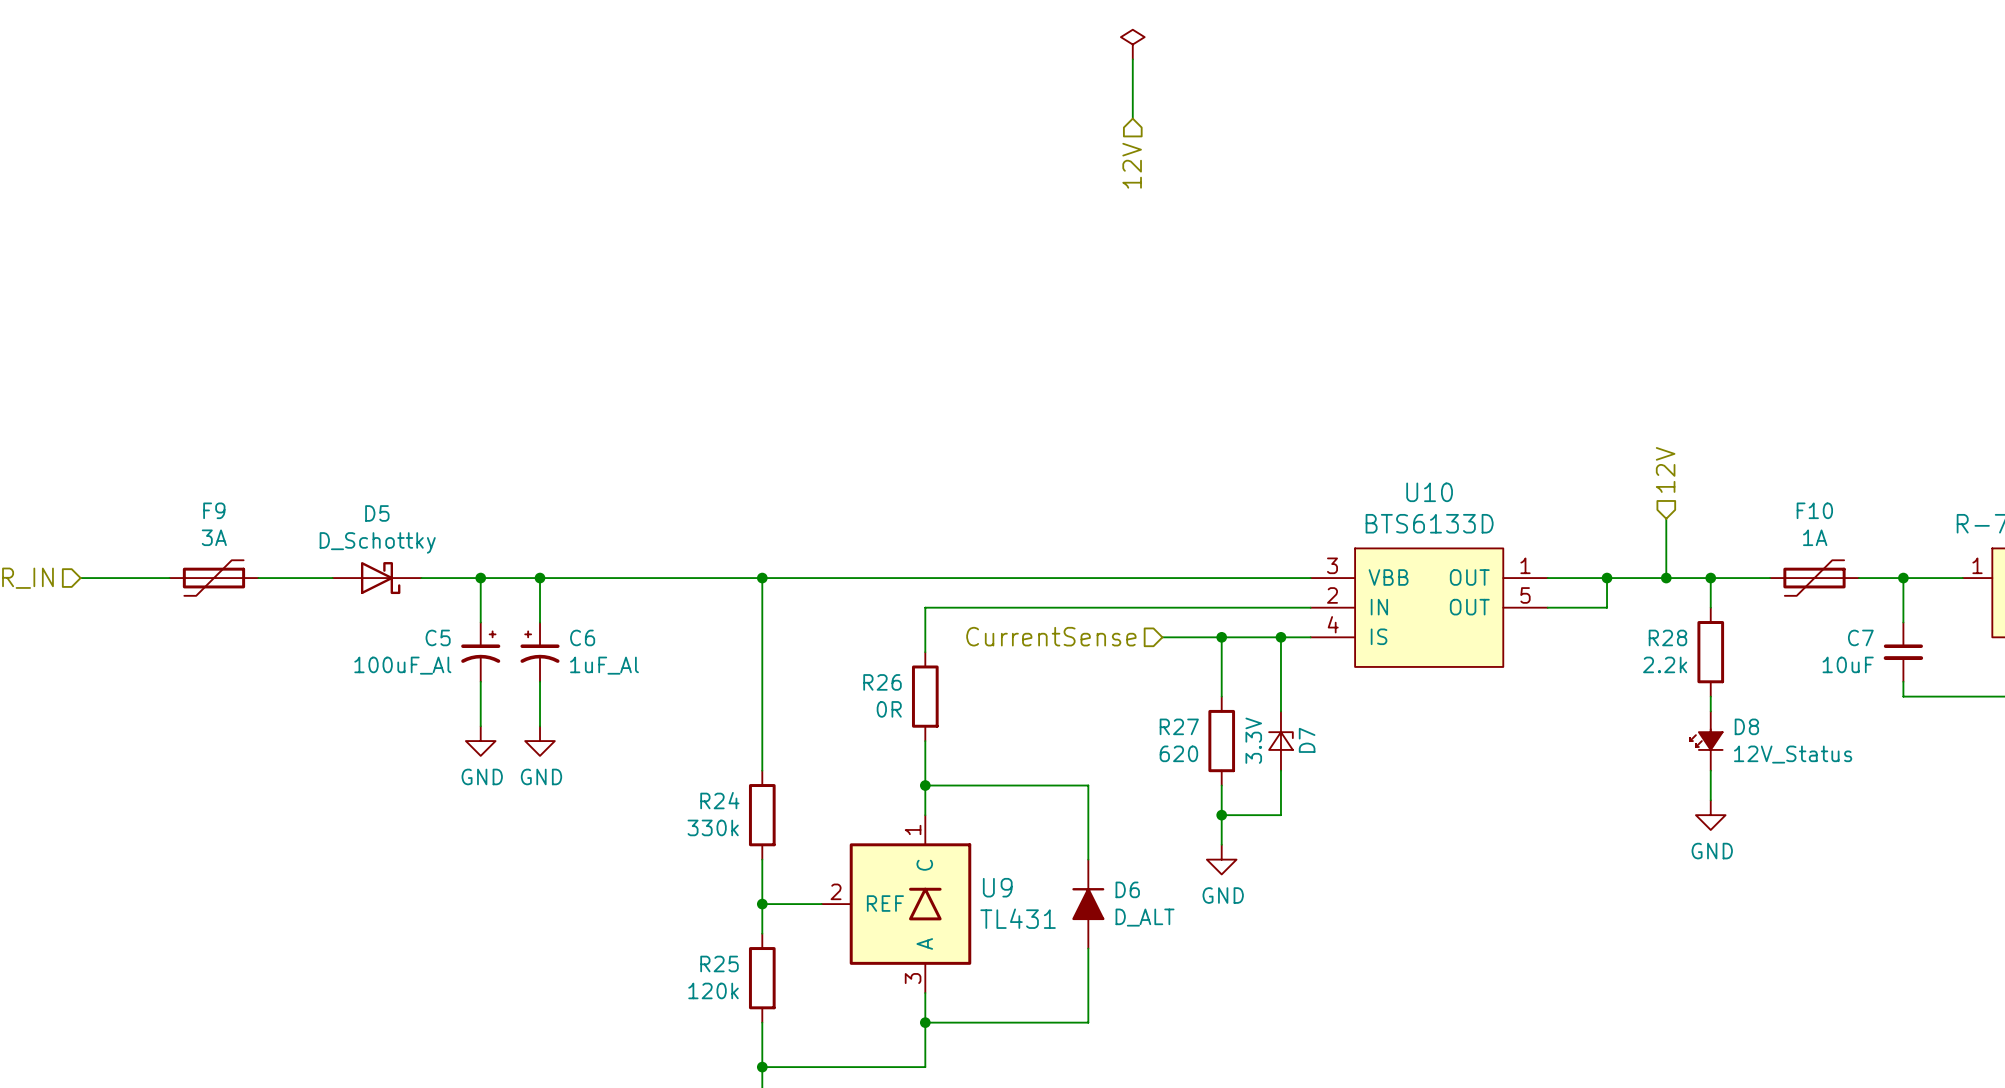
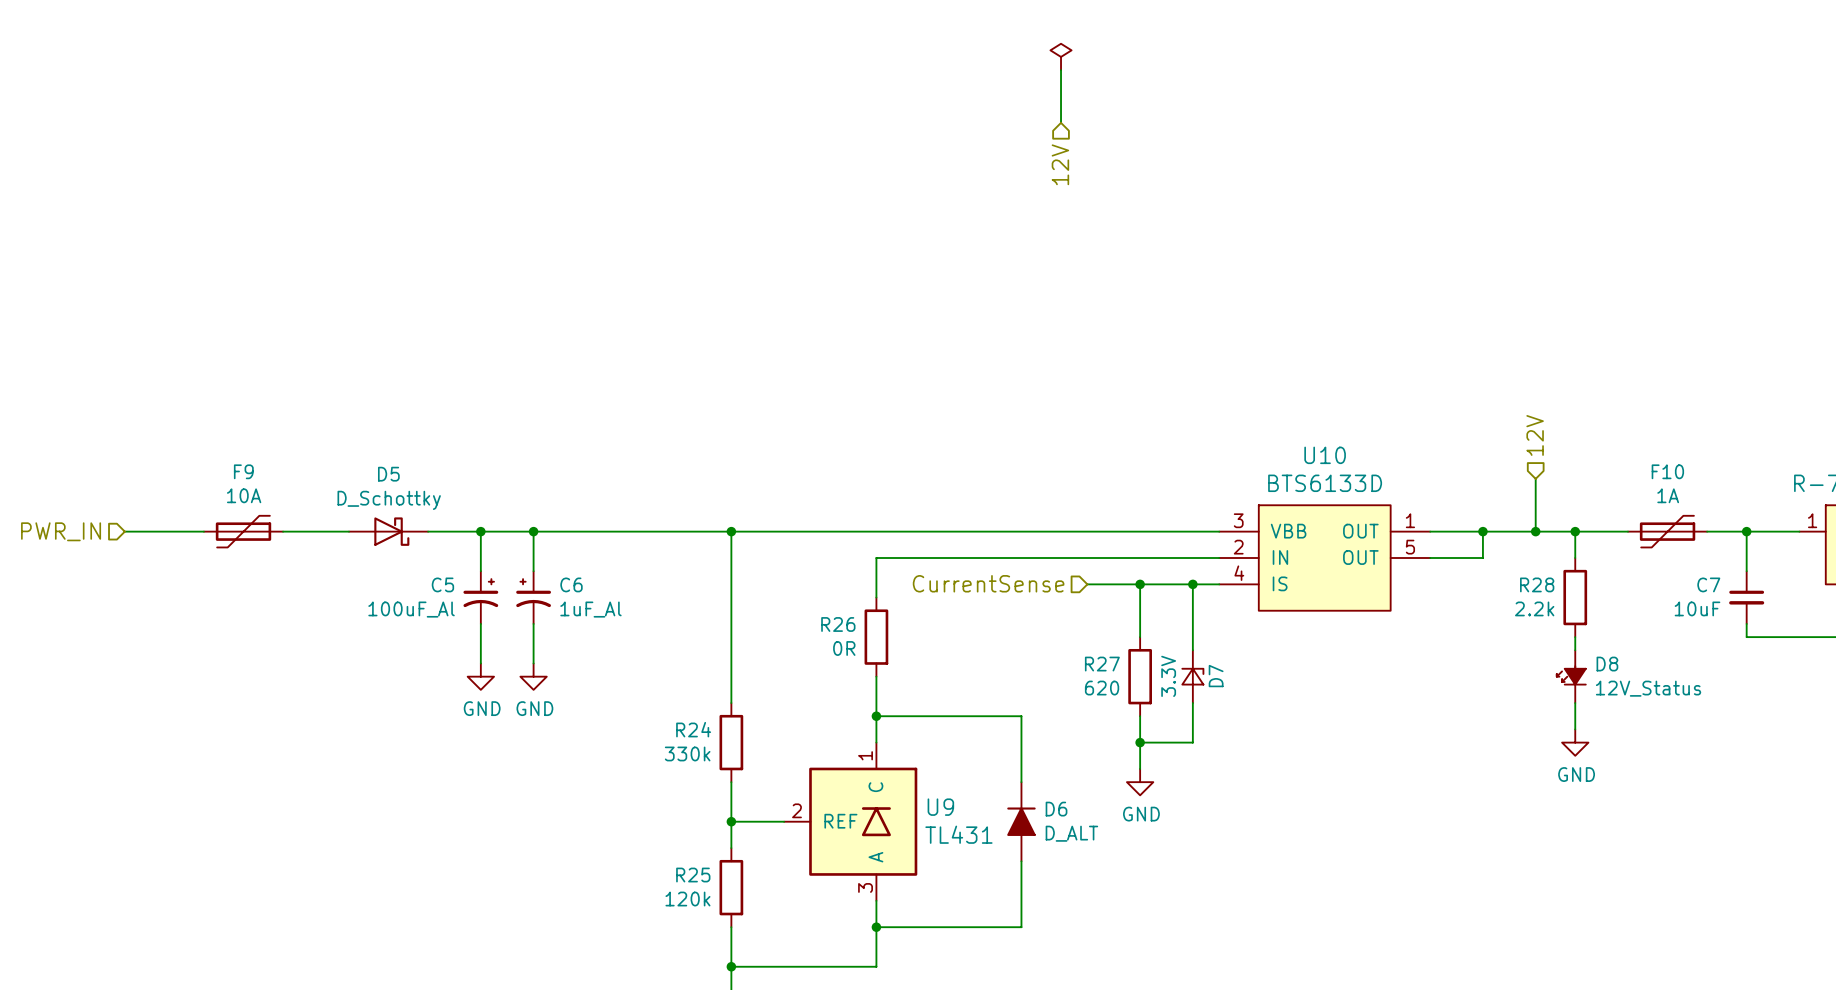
F9 value: 3A (214, 537) -> 10A (244, 495)

